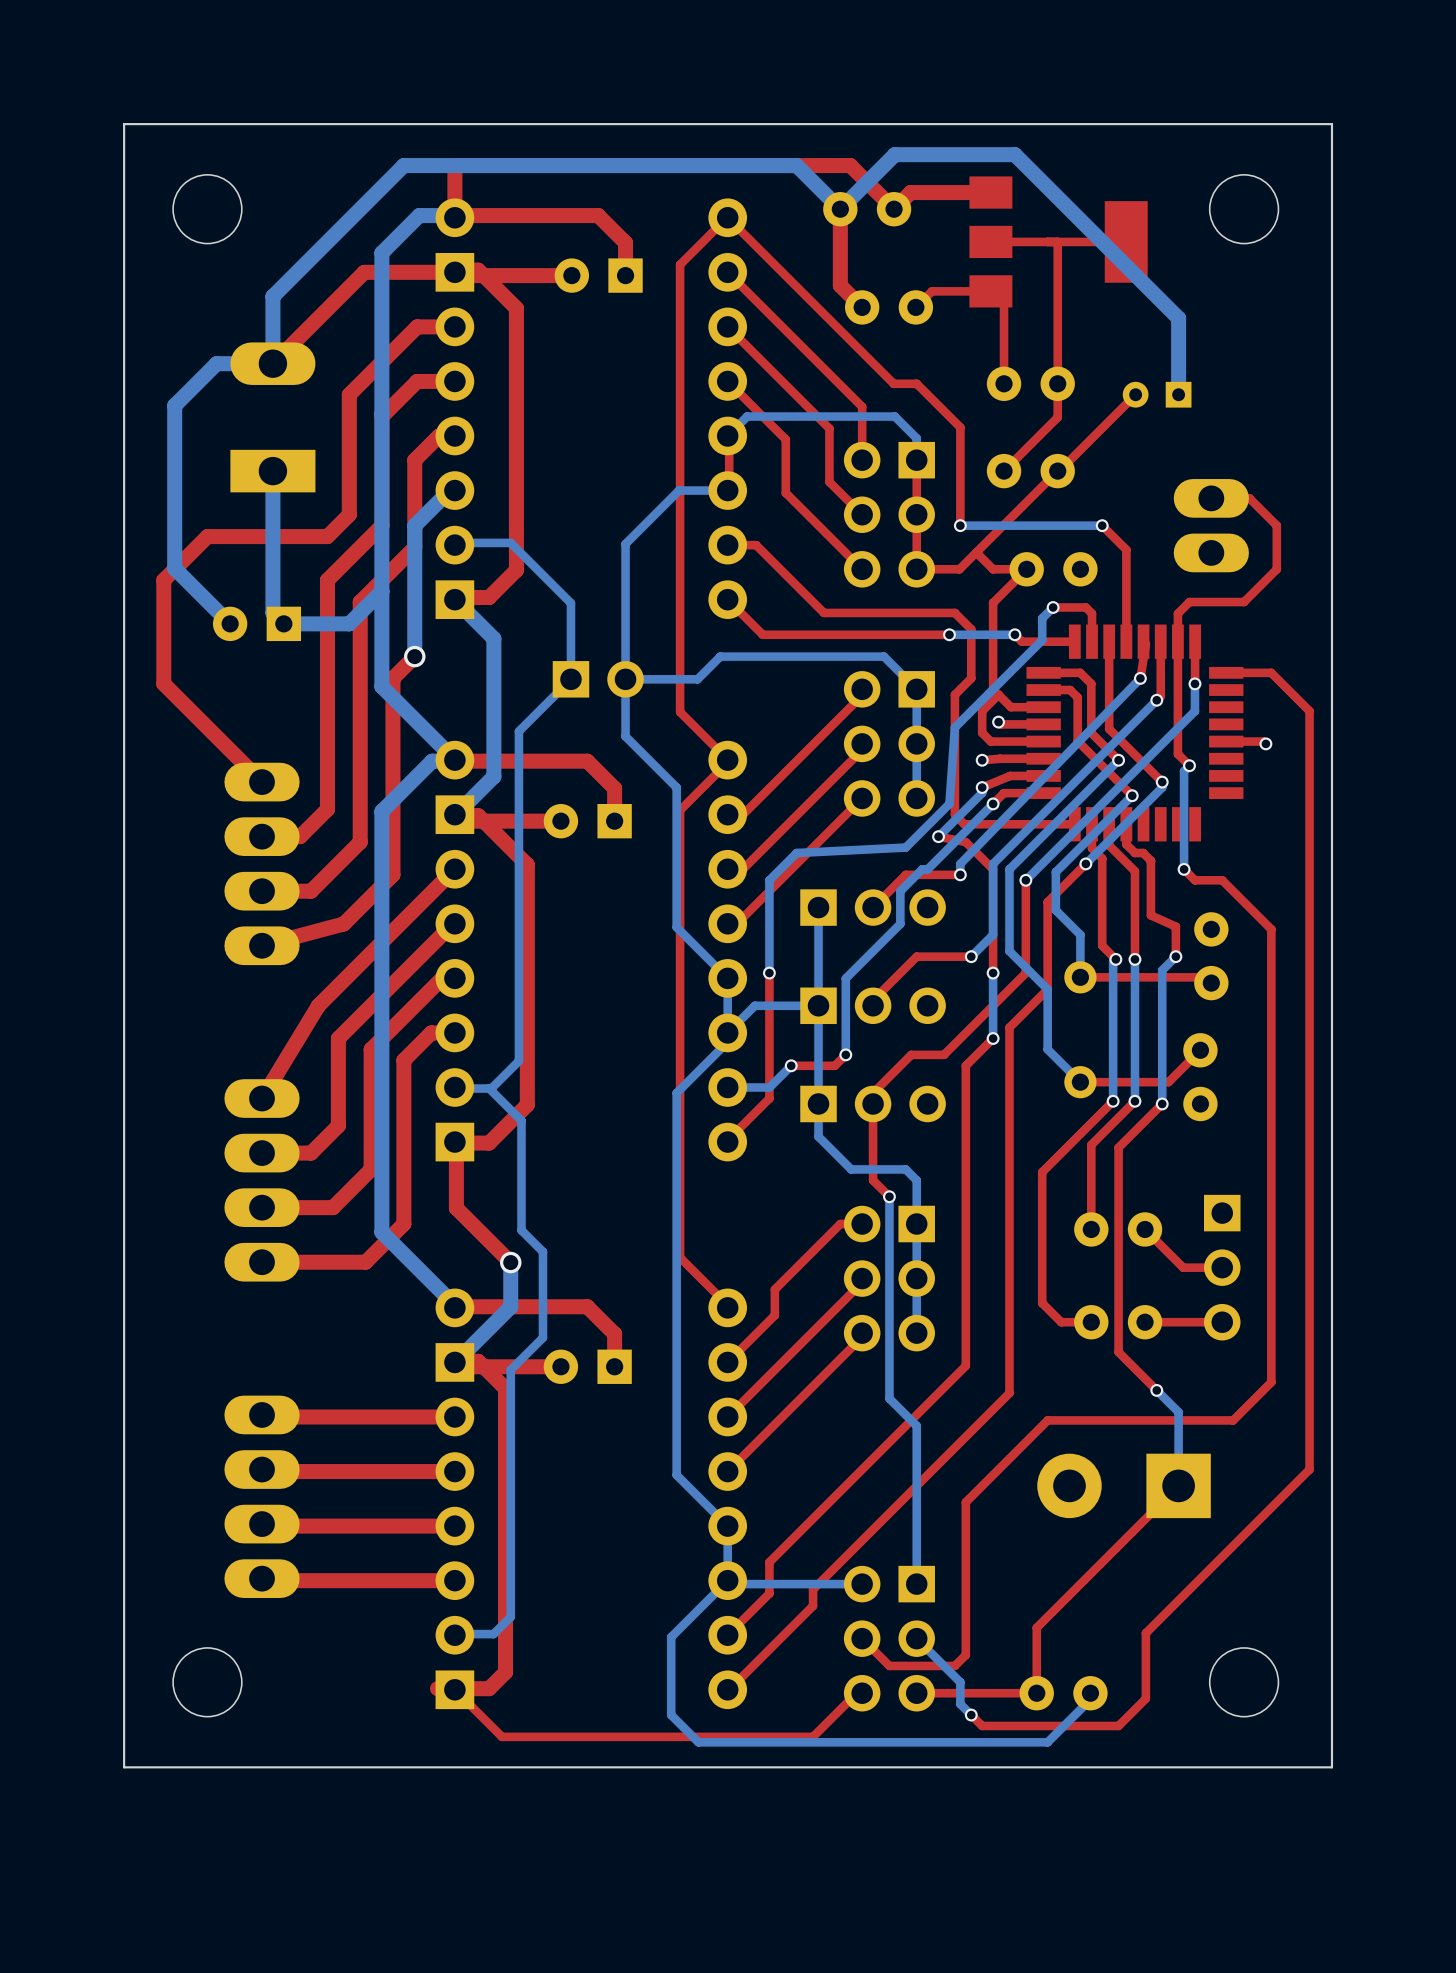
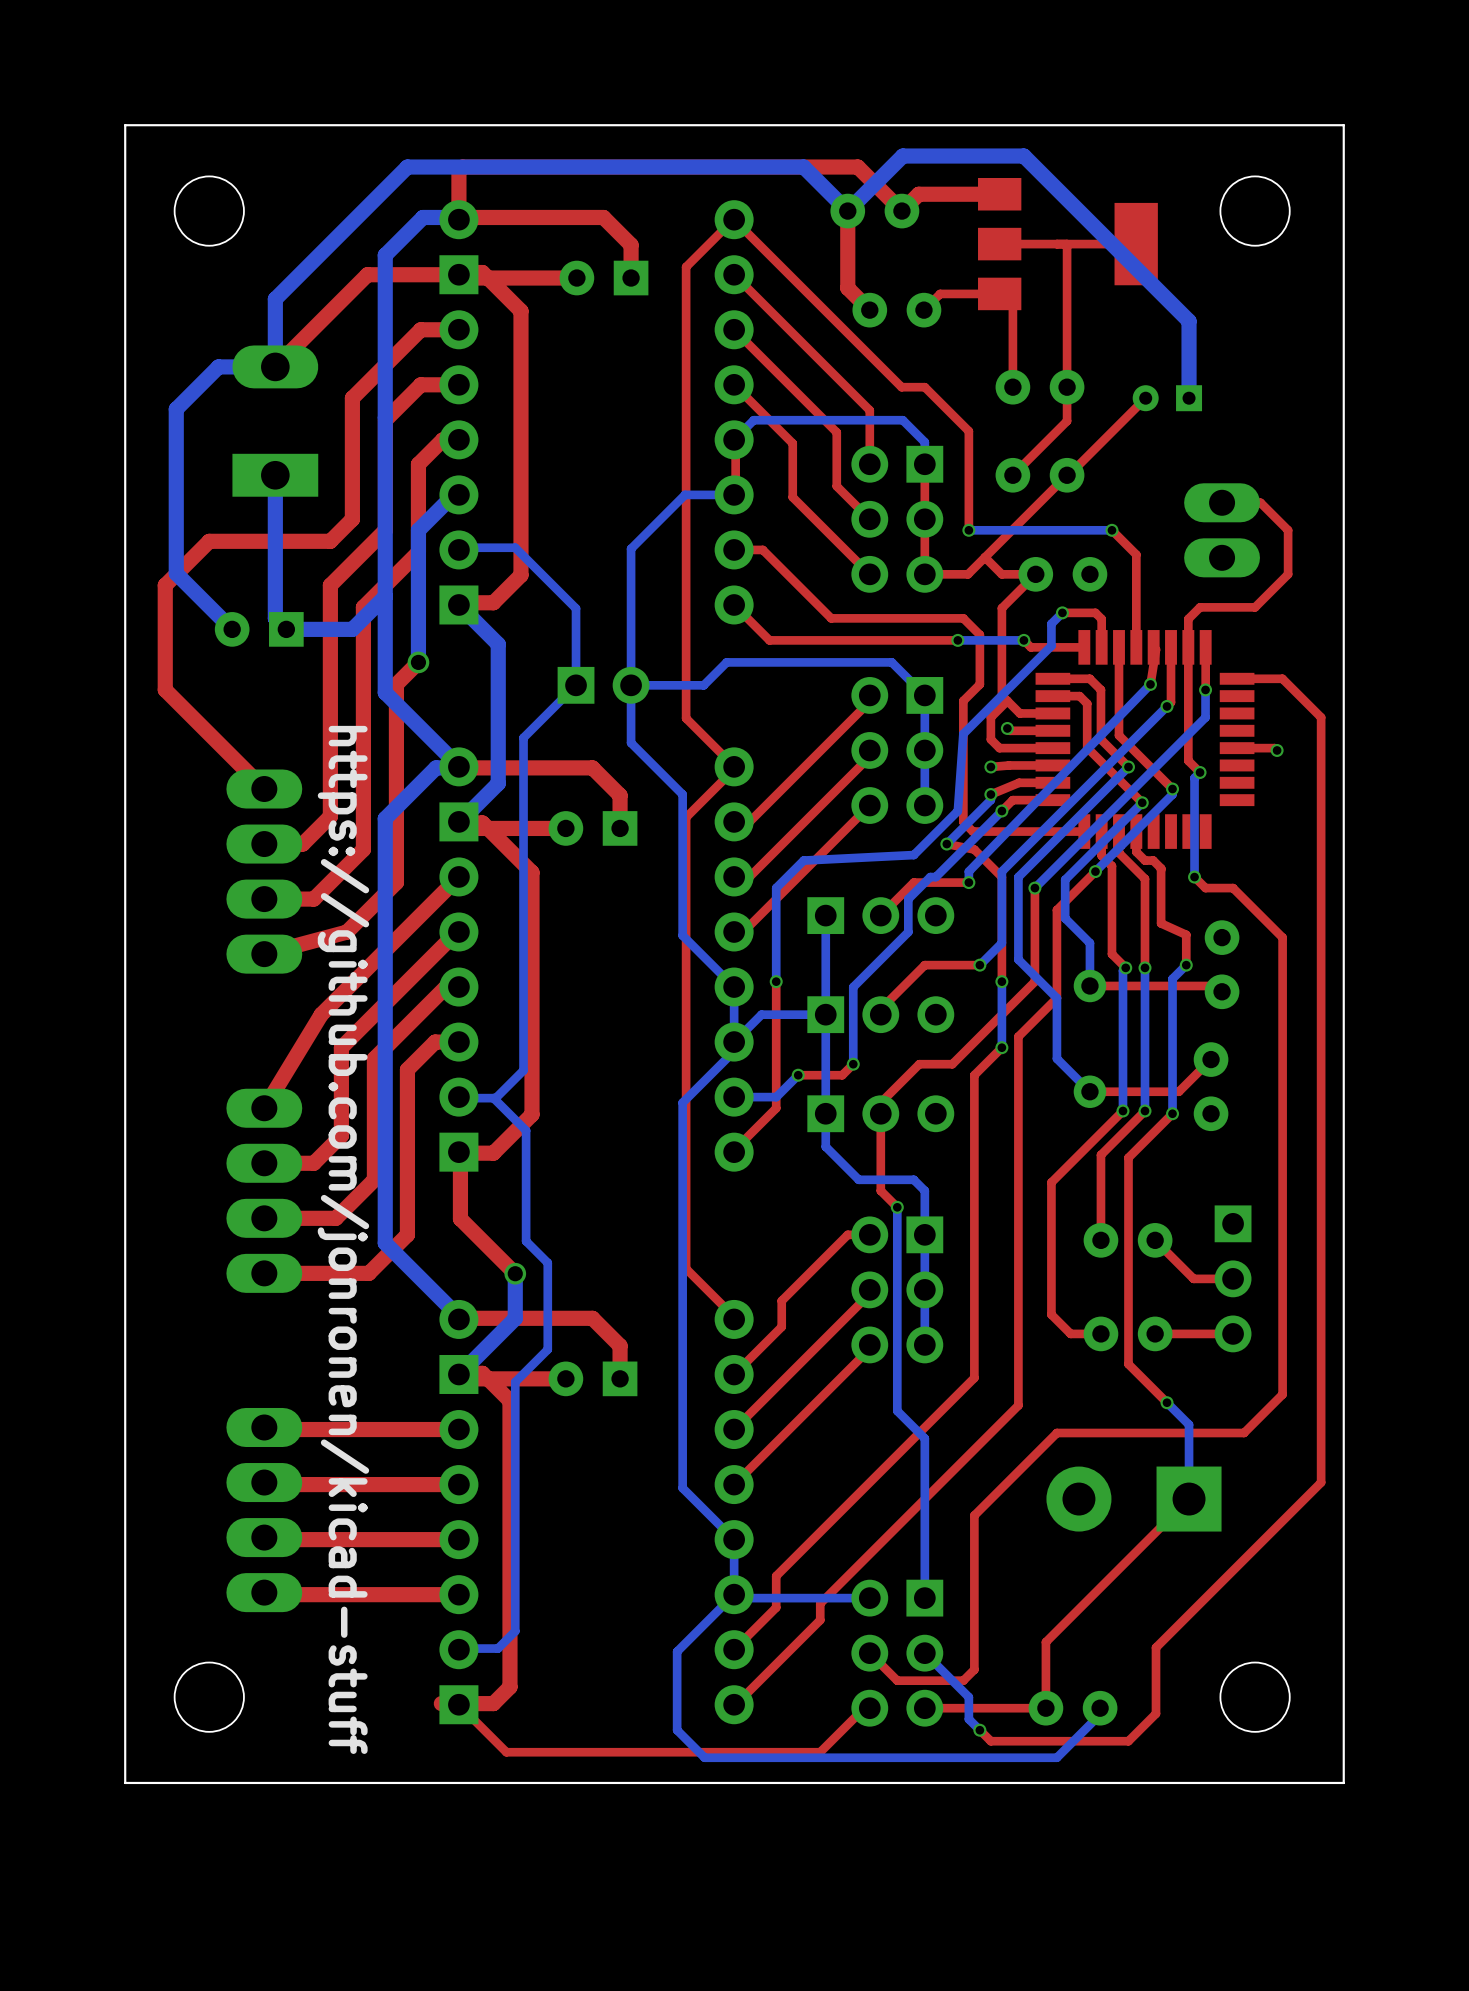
text: none -> https://github.com/jonronen/kicad-stuff (343, 1239)

